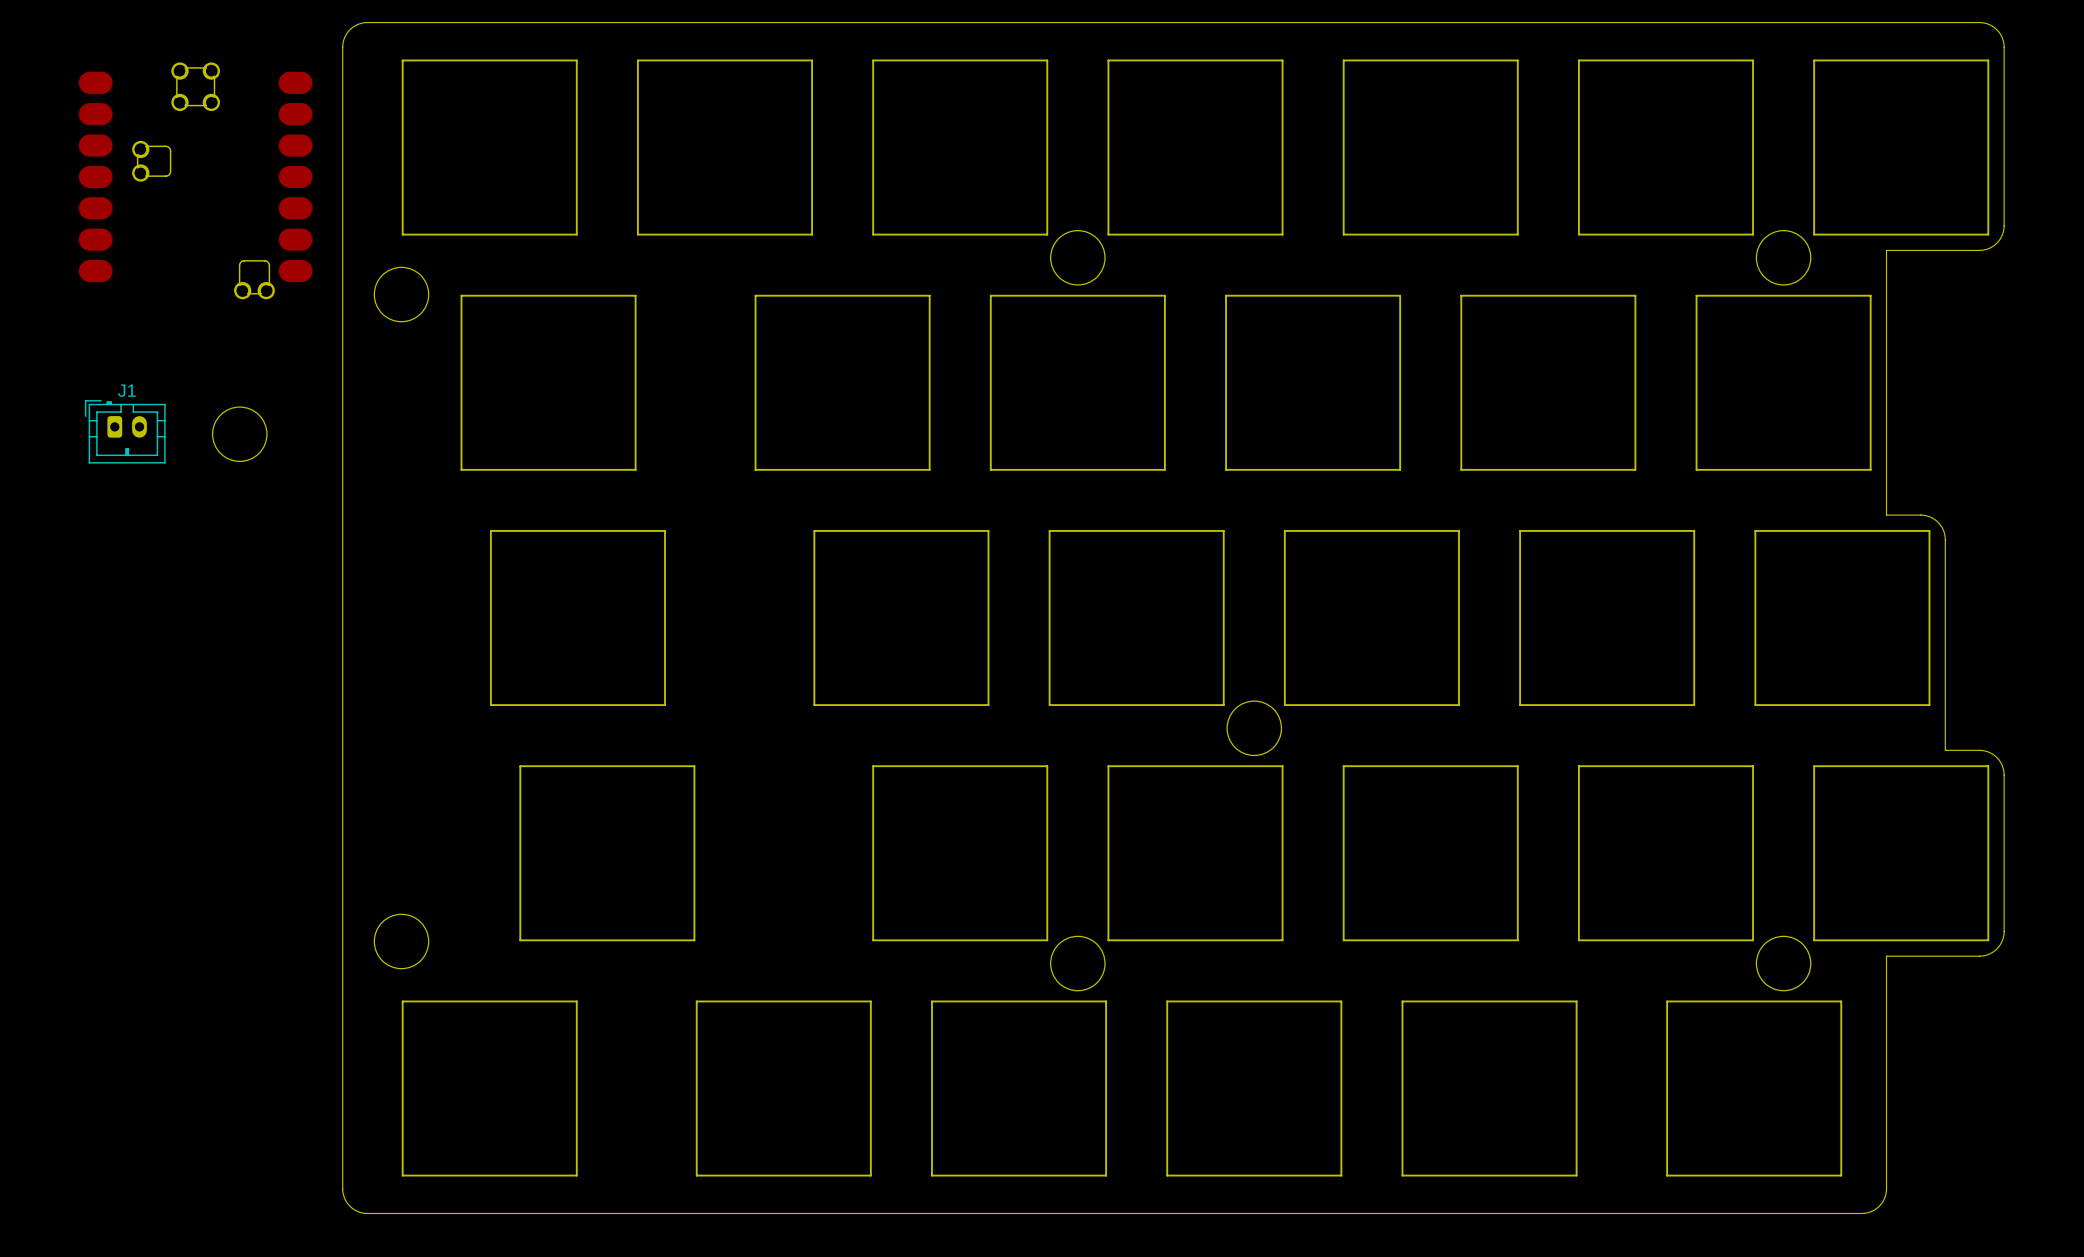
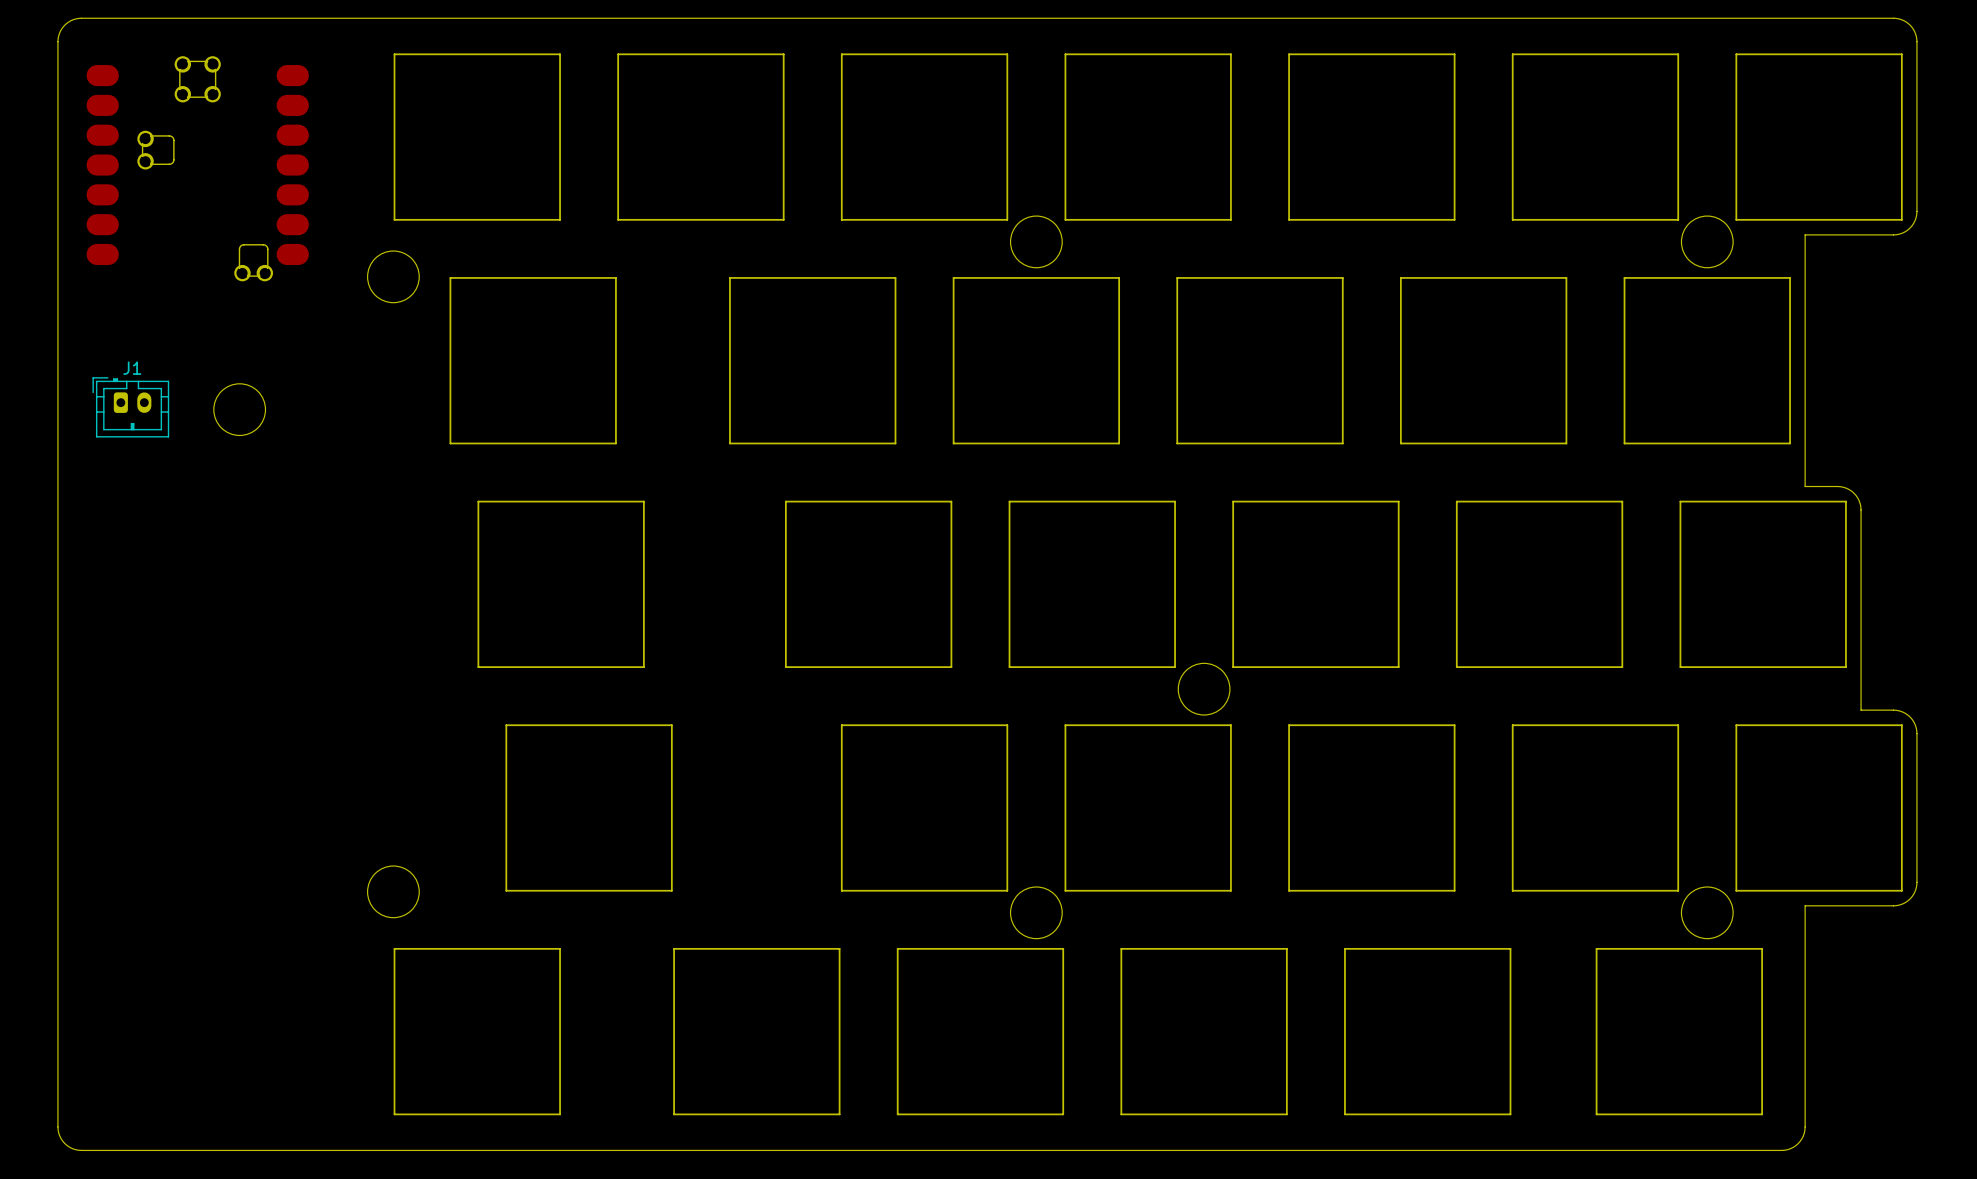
board edge: (367, 22) (356, 24) (349, 29) (345, 36) (342, 47) (342, 1188) (345, 1199) (349, 1206) (356, 1211) (367, 1213) -> (360, 18) (78, 18) (64, 25) (60, 31) (57, 41) (58, 1133) (67, 1145) (81, 1150) (360, 1150)

